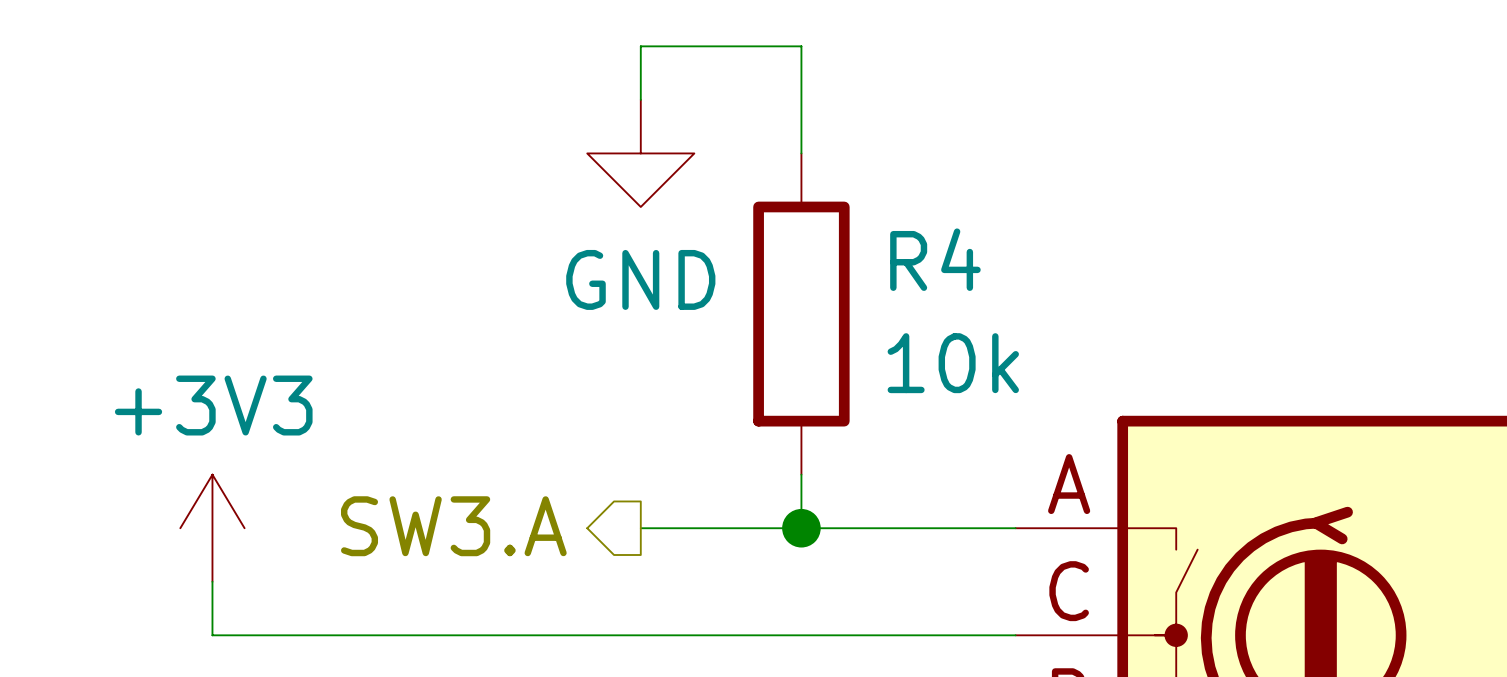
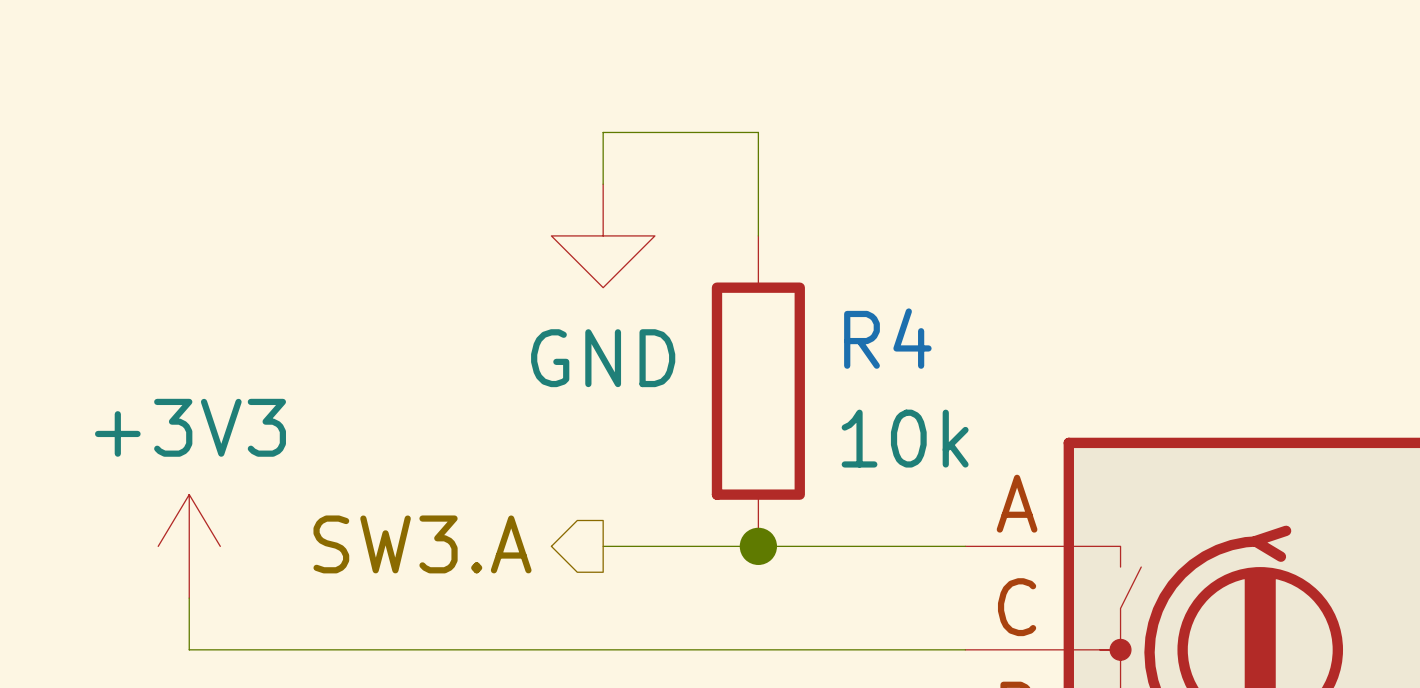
wire: (640, 99) (640, 46) (801, 46) (801, 99) -> (603, 184) (603, 132) (758, 132)
power symbol position: GND (640, 153) -> GND (603, 235)
R4 position: (801, 314) -> (758, 391)

